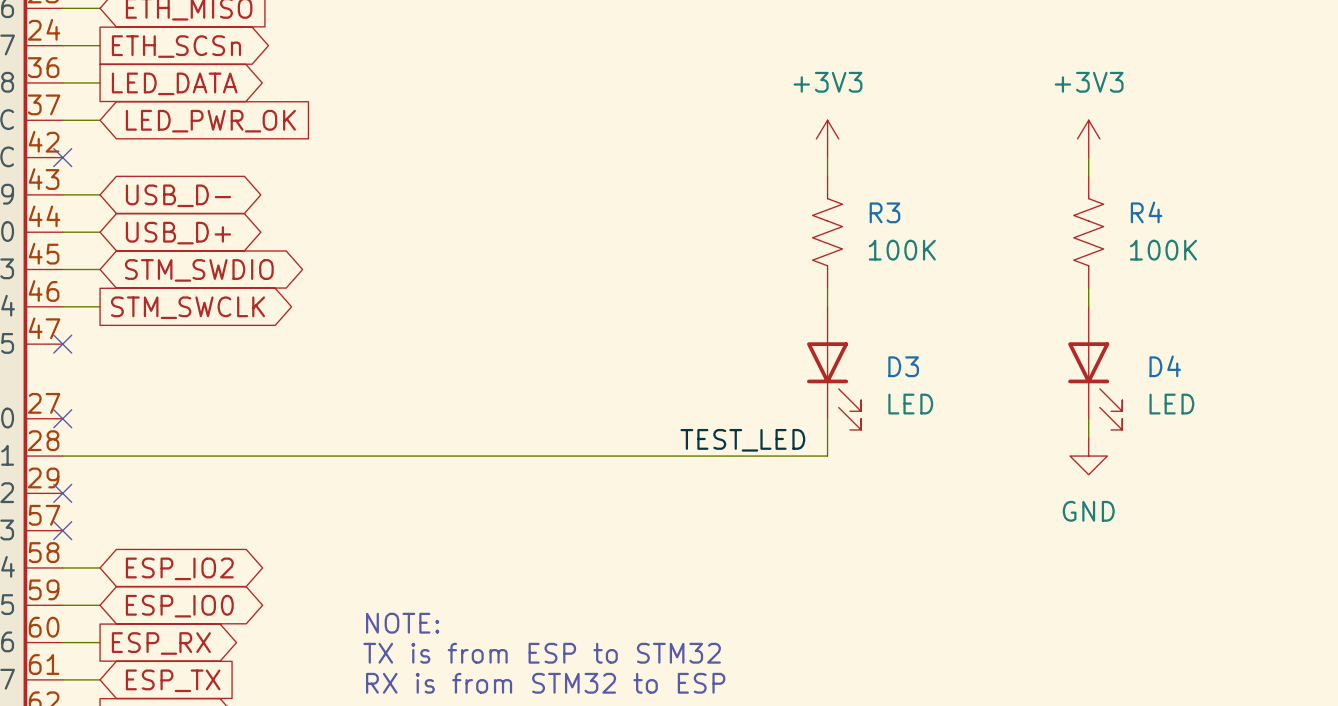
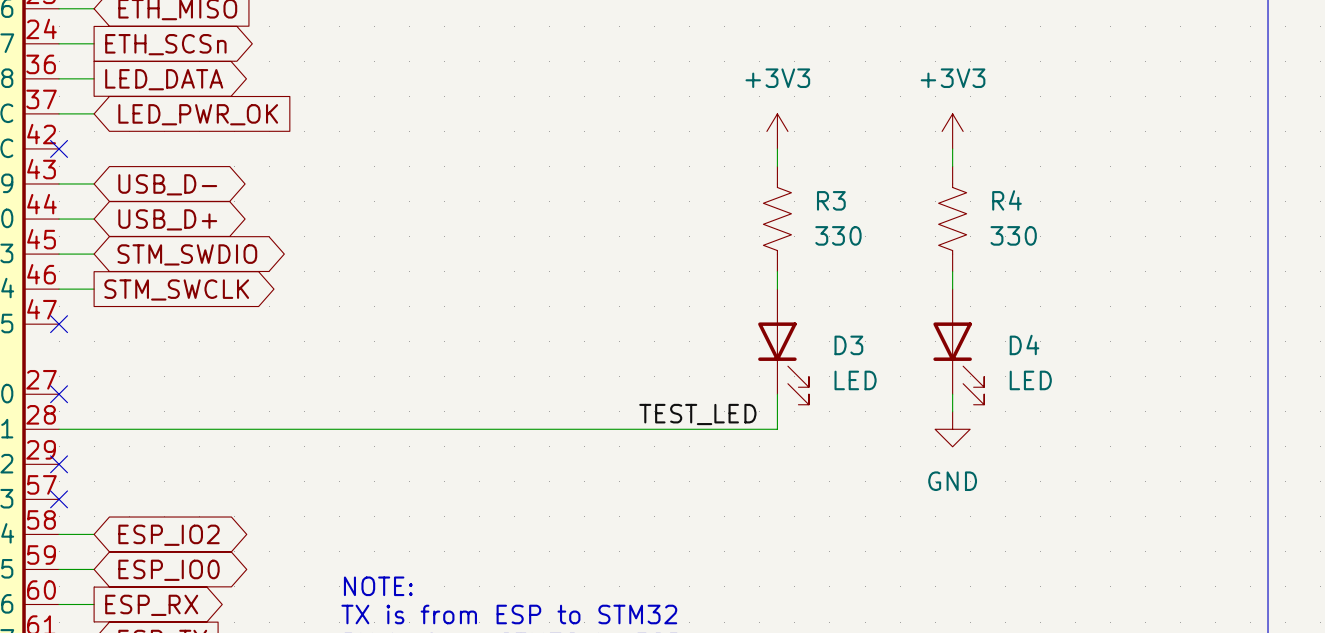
power symbol position: +3V3 (1088, 138) -> +3V3 (952, 131)
wire: (1088, 157) (1088, 176) -> (952, 148) (952, 166)
R4 position: (1088, 232) -> (952, 219)
R3 value: 100K (902, 250) -> 330 (838, 235)
R4 value: 100K (1163, 250) -> 330 (1013, 235)
wire: (1088, 288) (1088, 306) -> (952, 271) (952, 289)
D4 position: (1095, 368) -> (958, 346)
wire: (1088, 418) (1088, 437) -> (952, 394) (952, 411)
power symbol position: GND (1088, 456) -> GND (952, 429)

